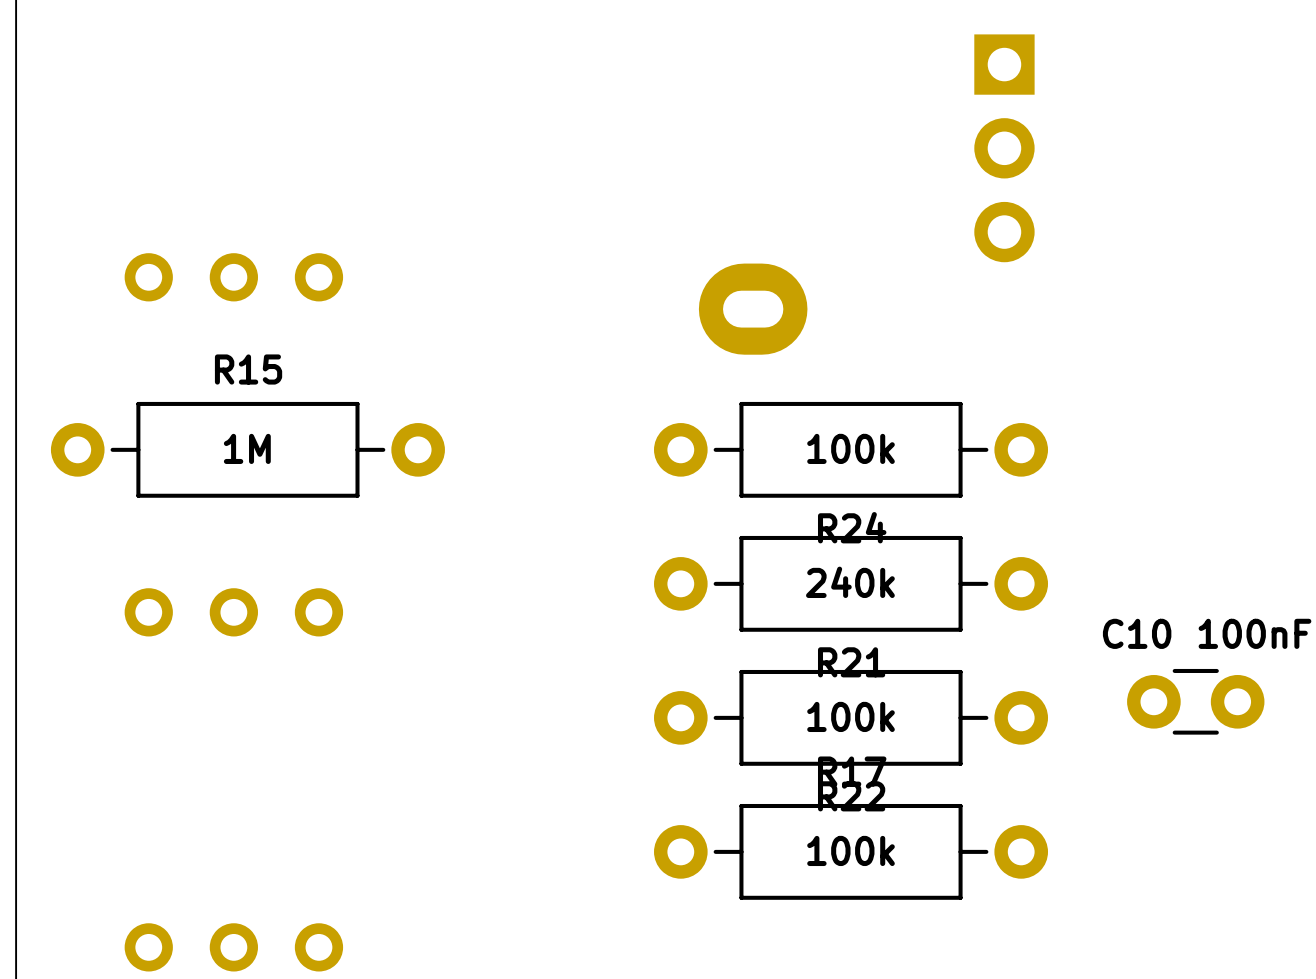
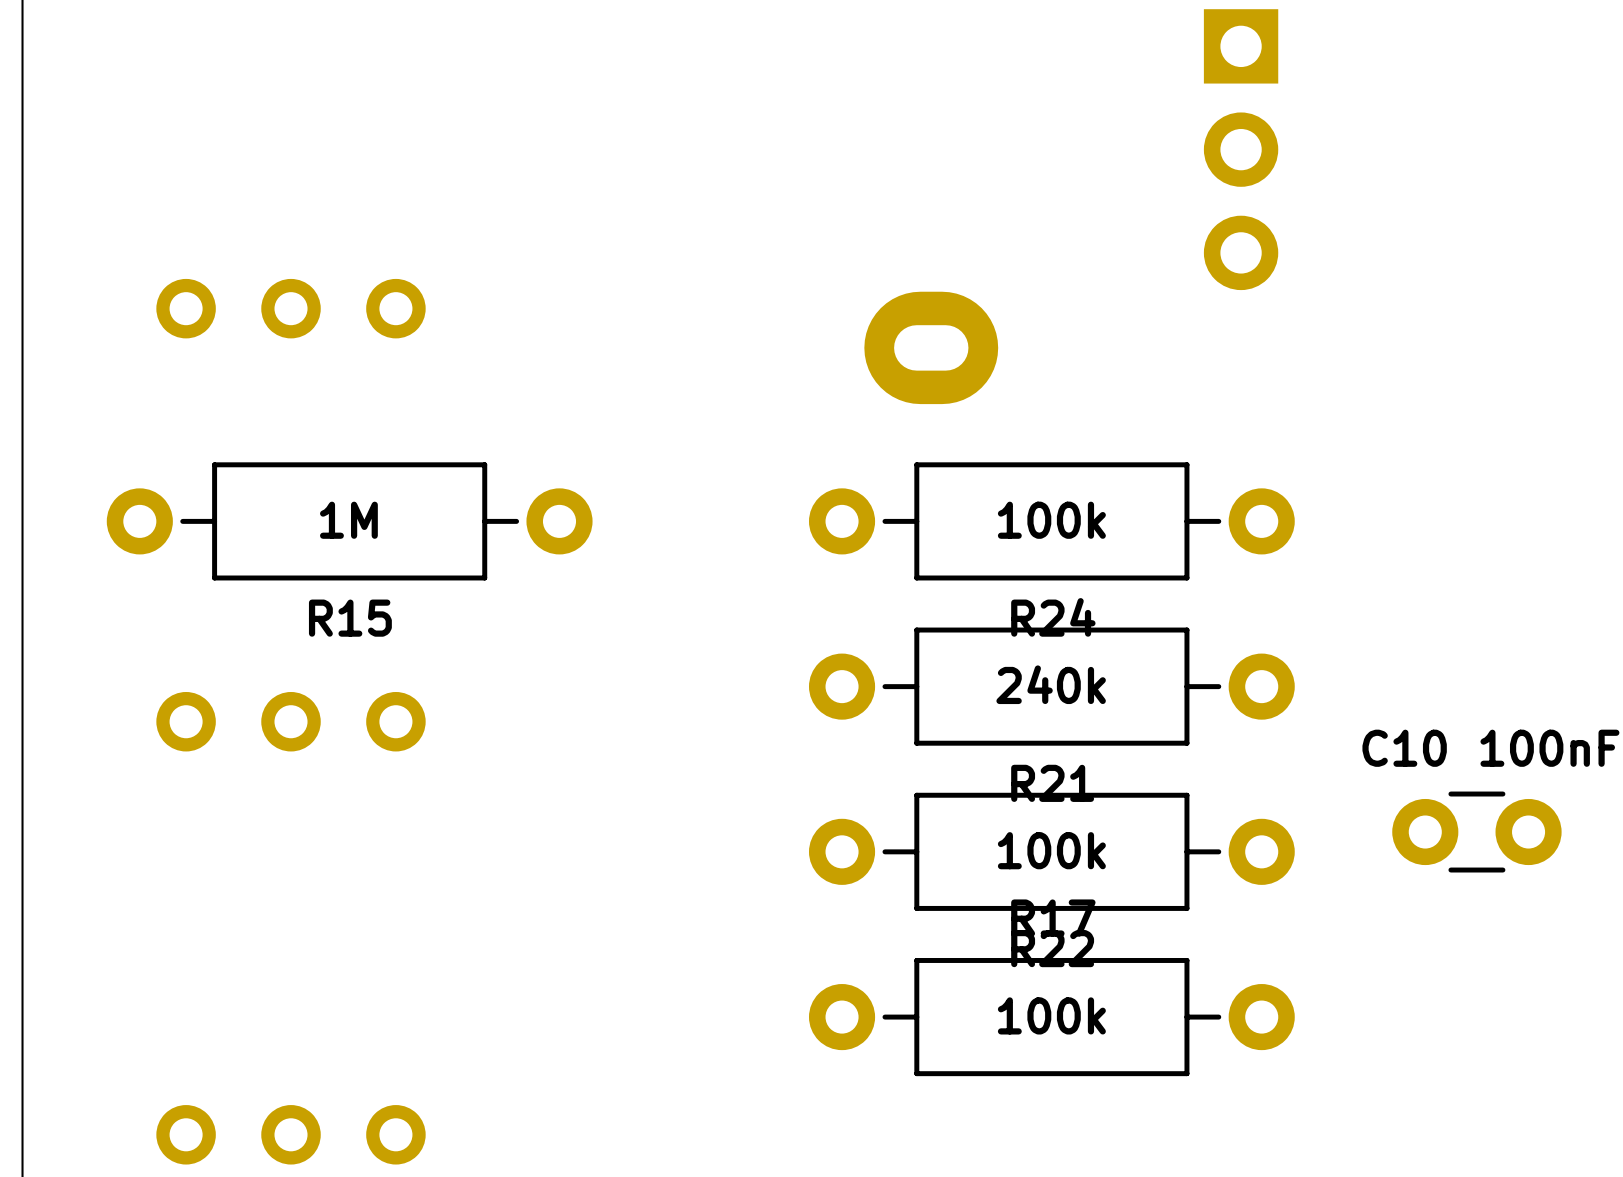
R15 name position: R15 (248, 369) -> R15 (350, 618)
R15 position: (247, 449) -> (349, 521)

